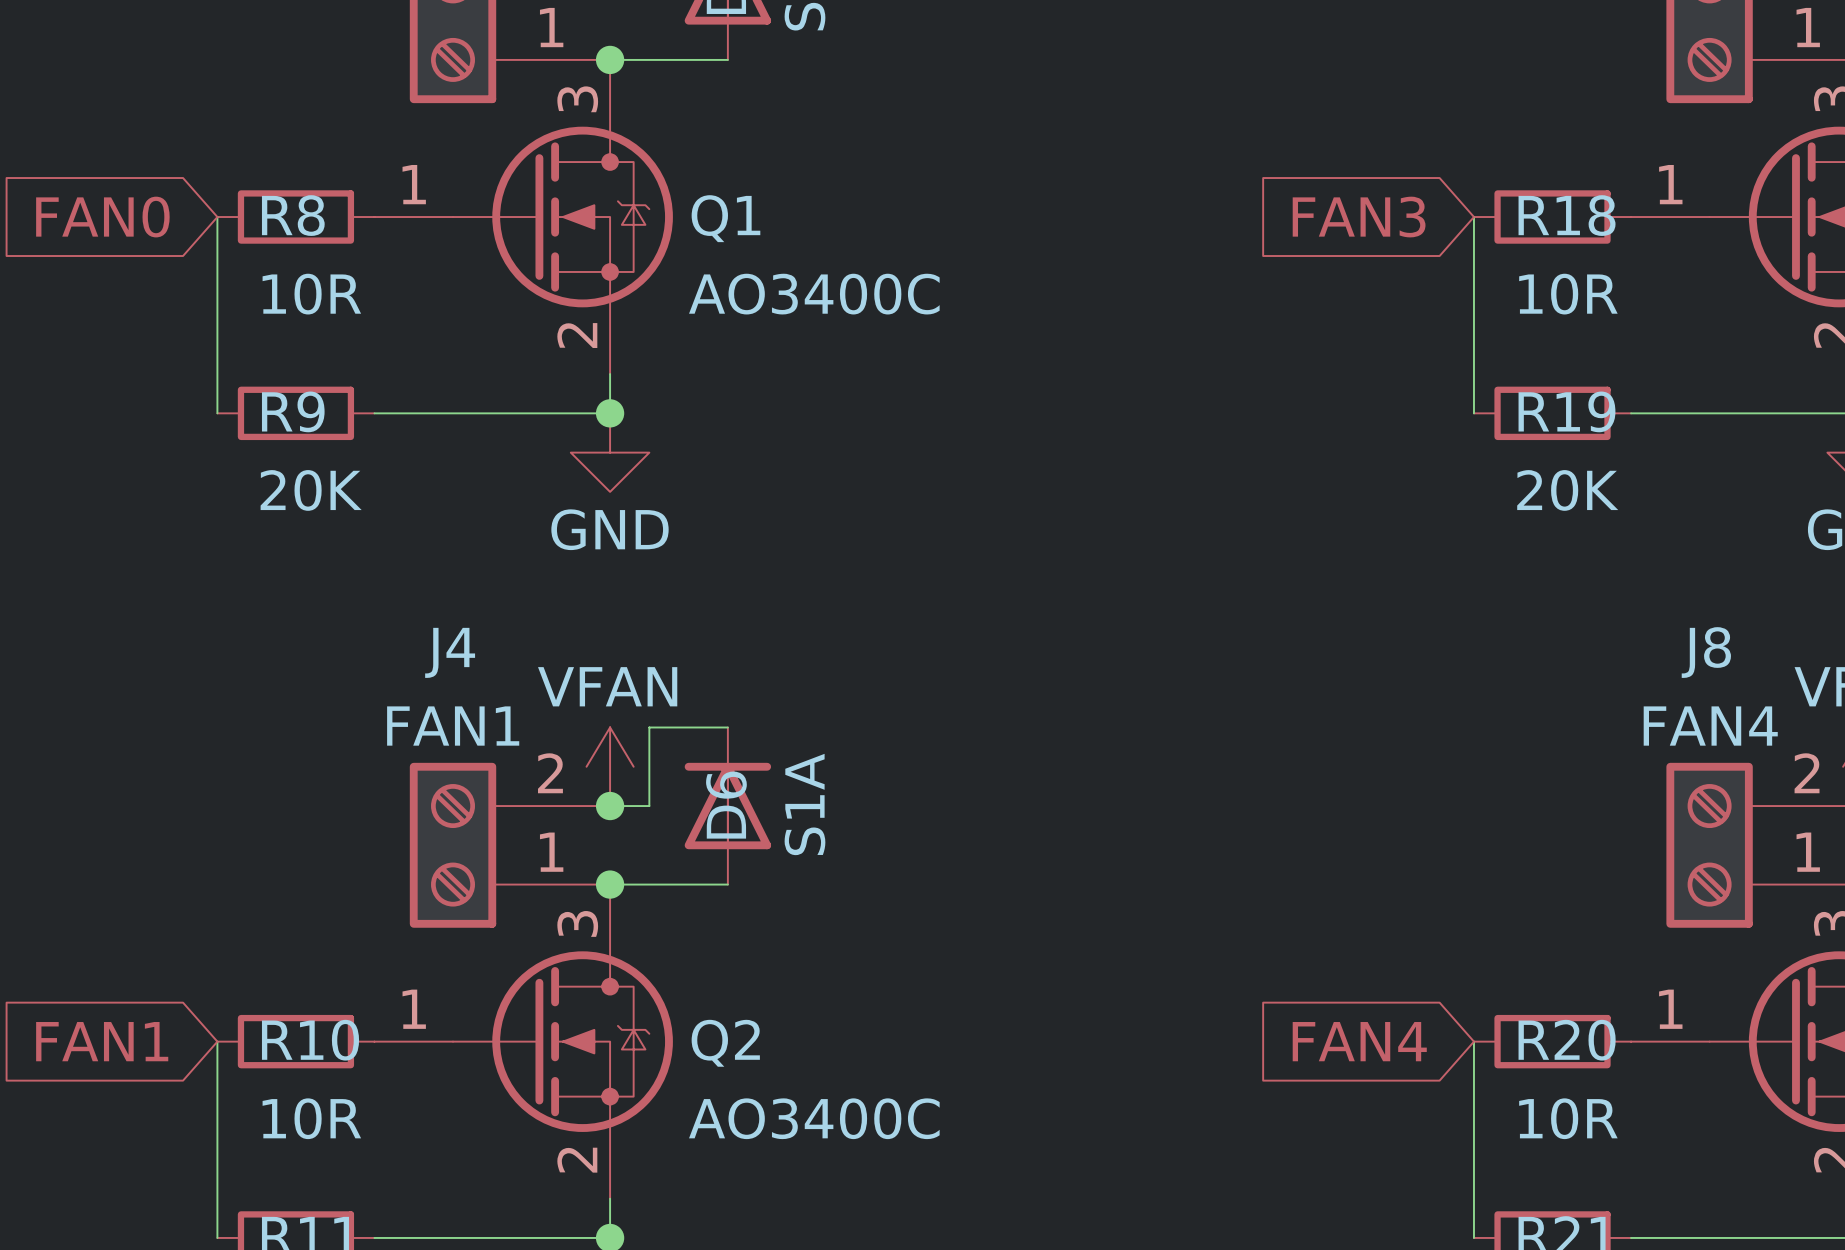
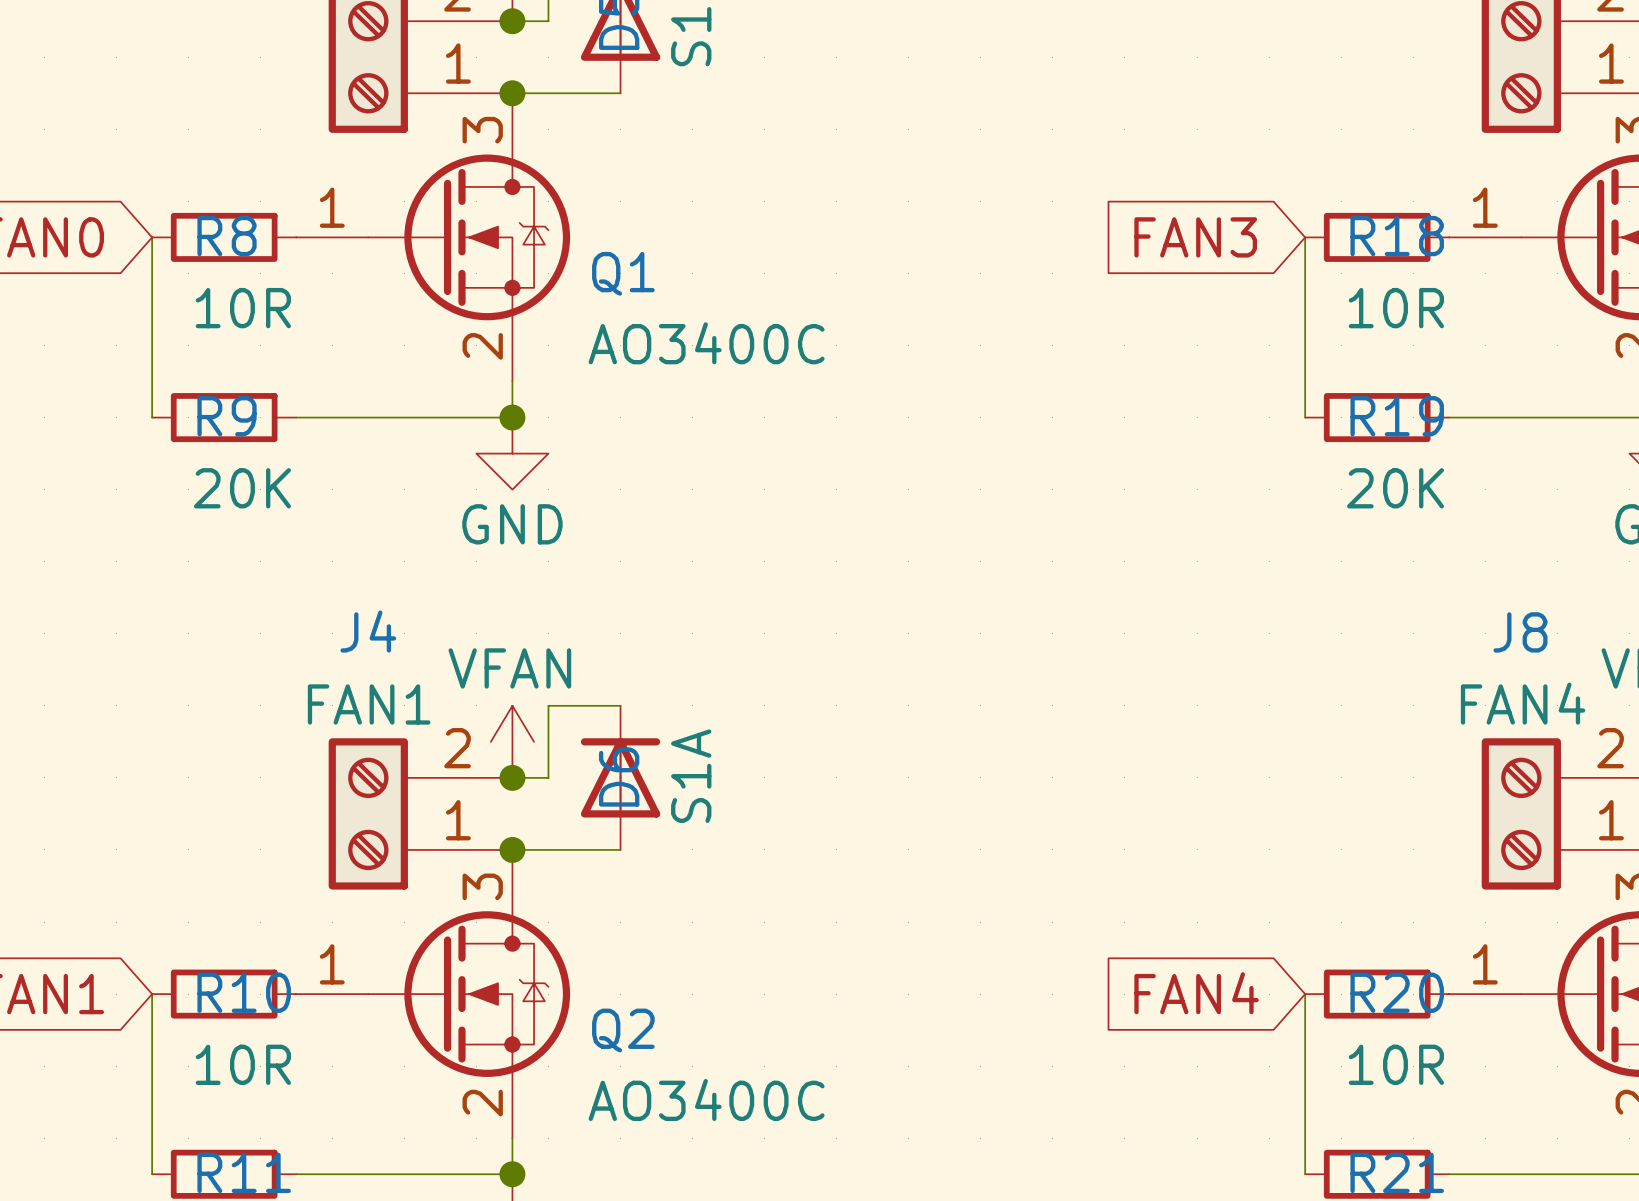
Q1 name position: Q1 (725, 218) -> Q1 (623, 273)
Q1 value position: AO3400C (814, 294) -> AO3400C (706, 343)
Q2 name position: Q2 (725, 1043) -> Q2 (623, 1030)
Q2 value position: AO3400C (814, 1118) -> AO3400C (706, 1099)

